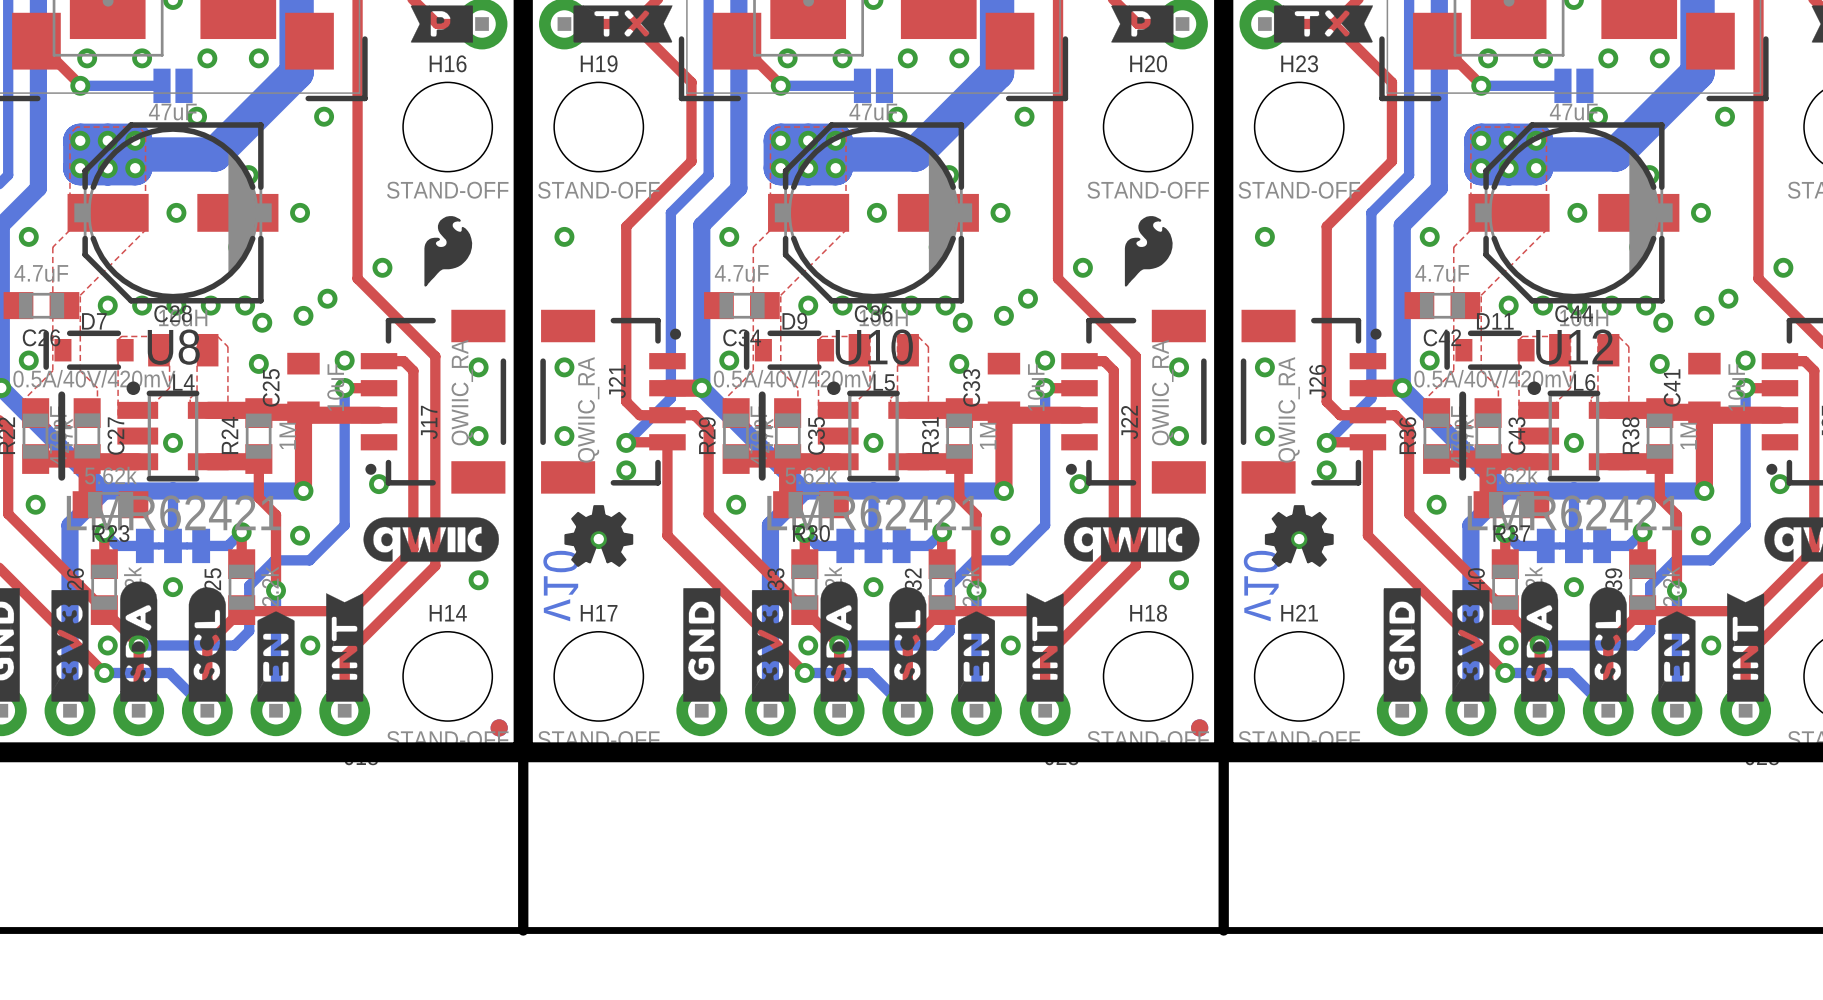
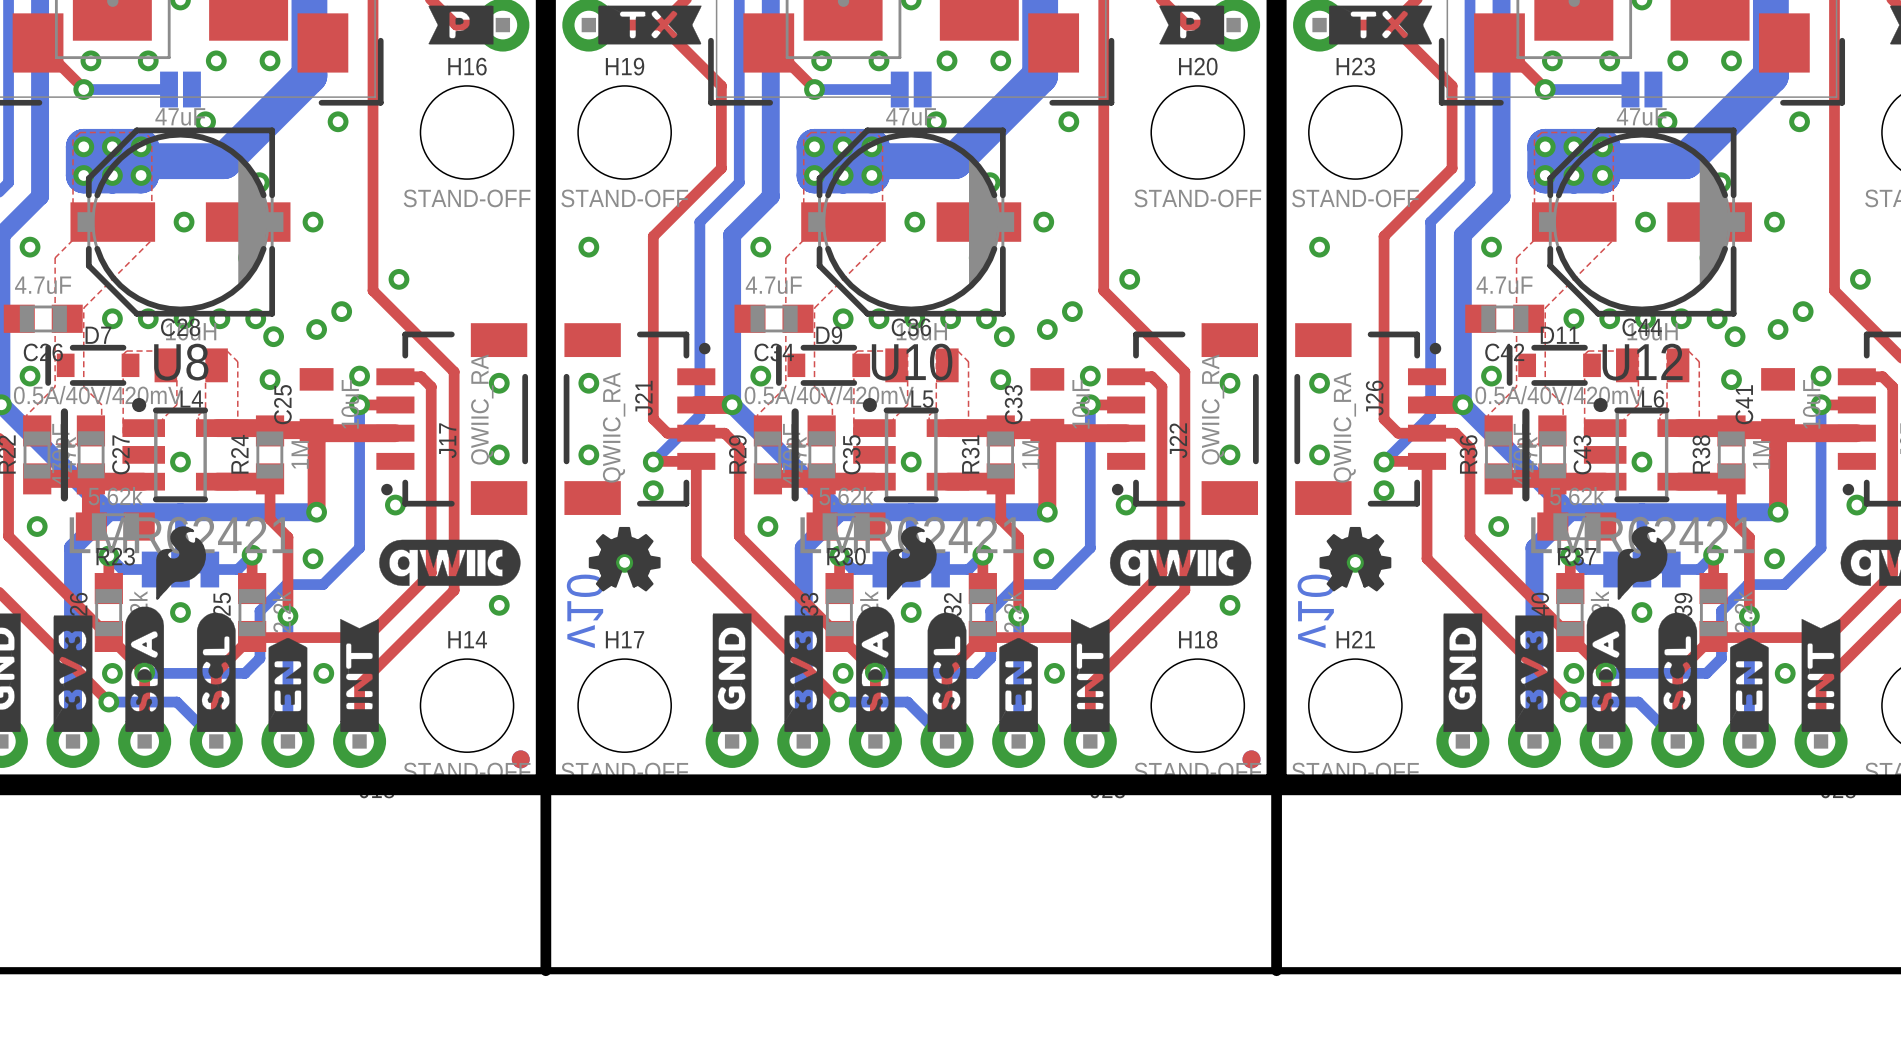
drawing: [424, 216, 473, 287] -> none
drawing: [1124, 216, 1173, 287] -> none
drawing: none -> [156, 526, 207, 600]
drawing: none -> [886, 526, 937, 600]
drawing: none -> [1617, 526, 1668, 600]

